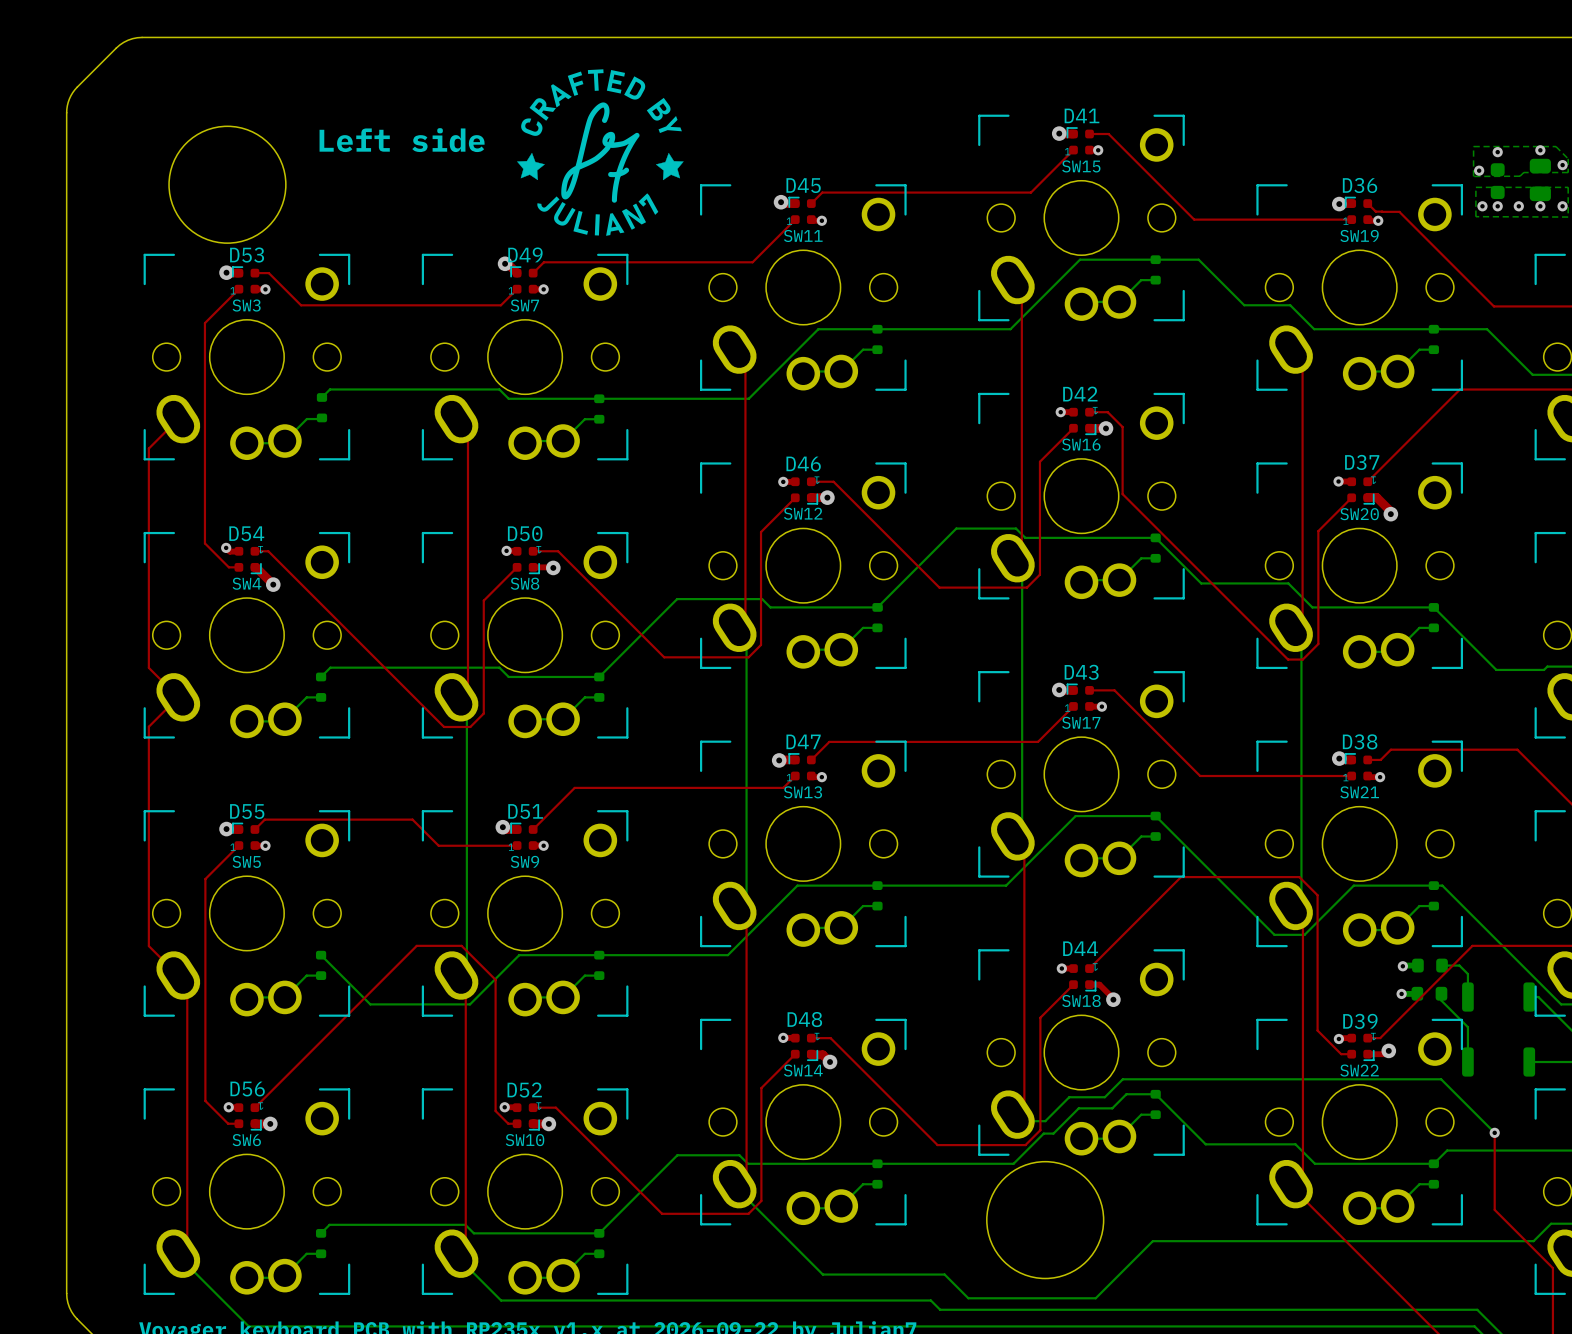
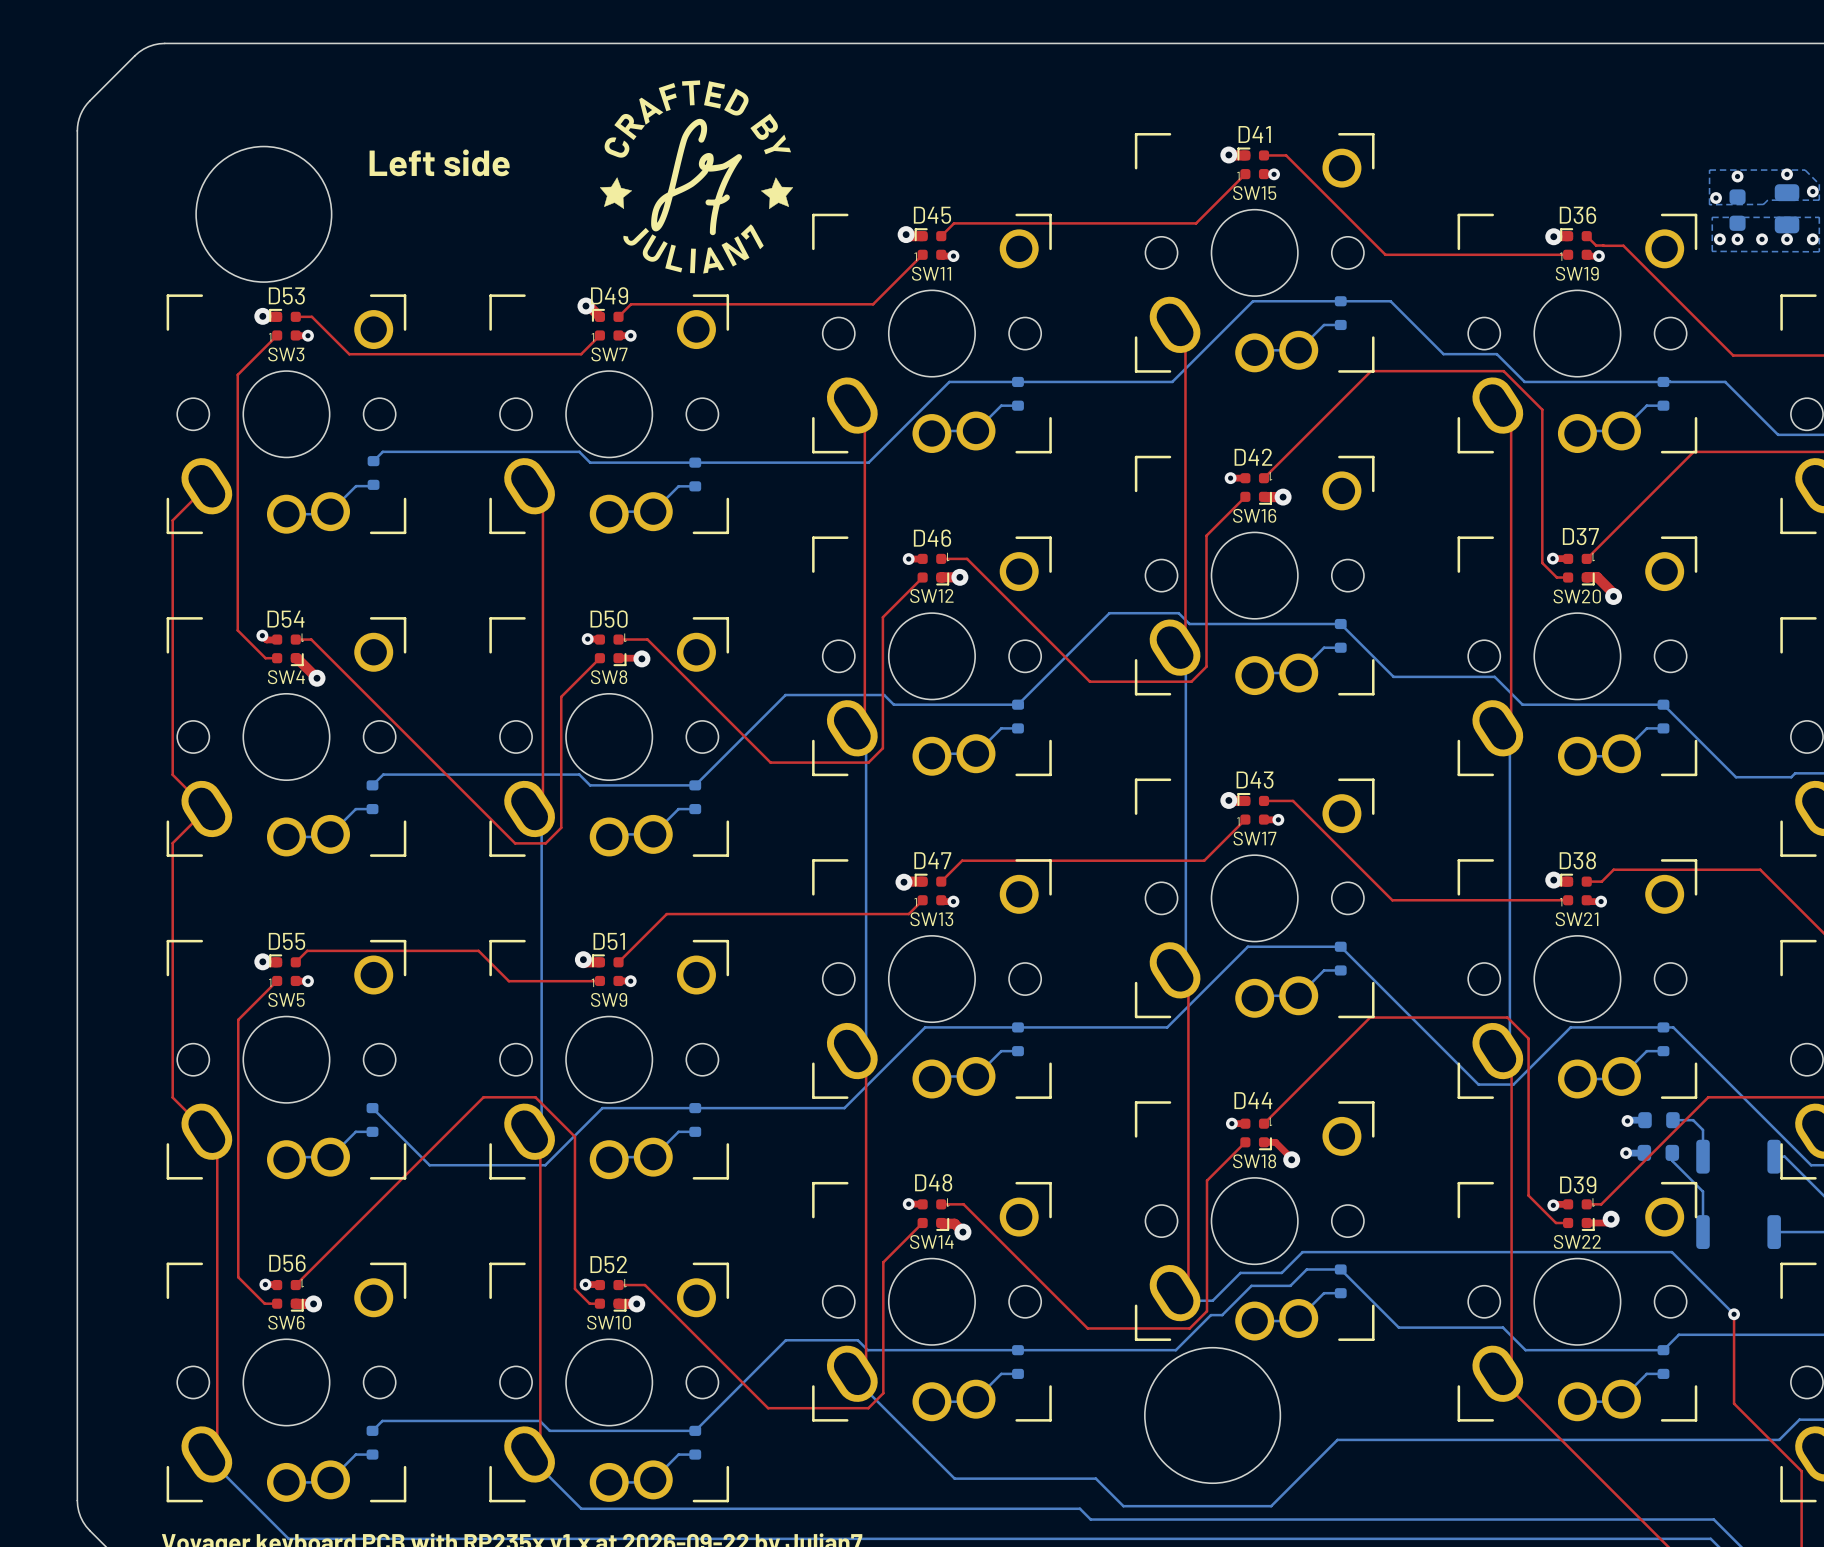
top track: (1089, 412) (1107, 412) (1122, 427) (1122, 494) (1288, 659) (1302, 659) (1318, 644) (1318, 531) (1351, 497) -> (1264, 478) (1371, 371) (1503, 371) (1542, 409) (1542, 563) (1556, 577) (1568, 577)

